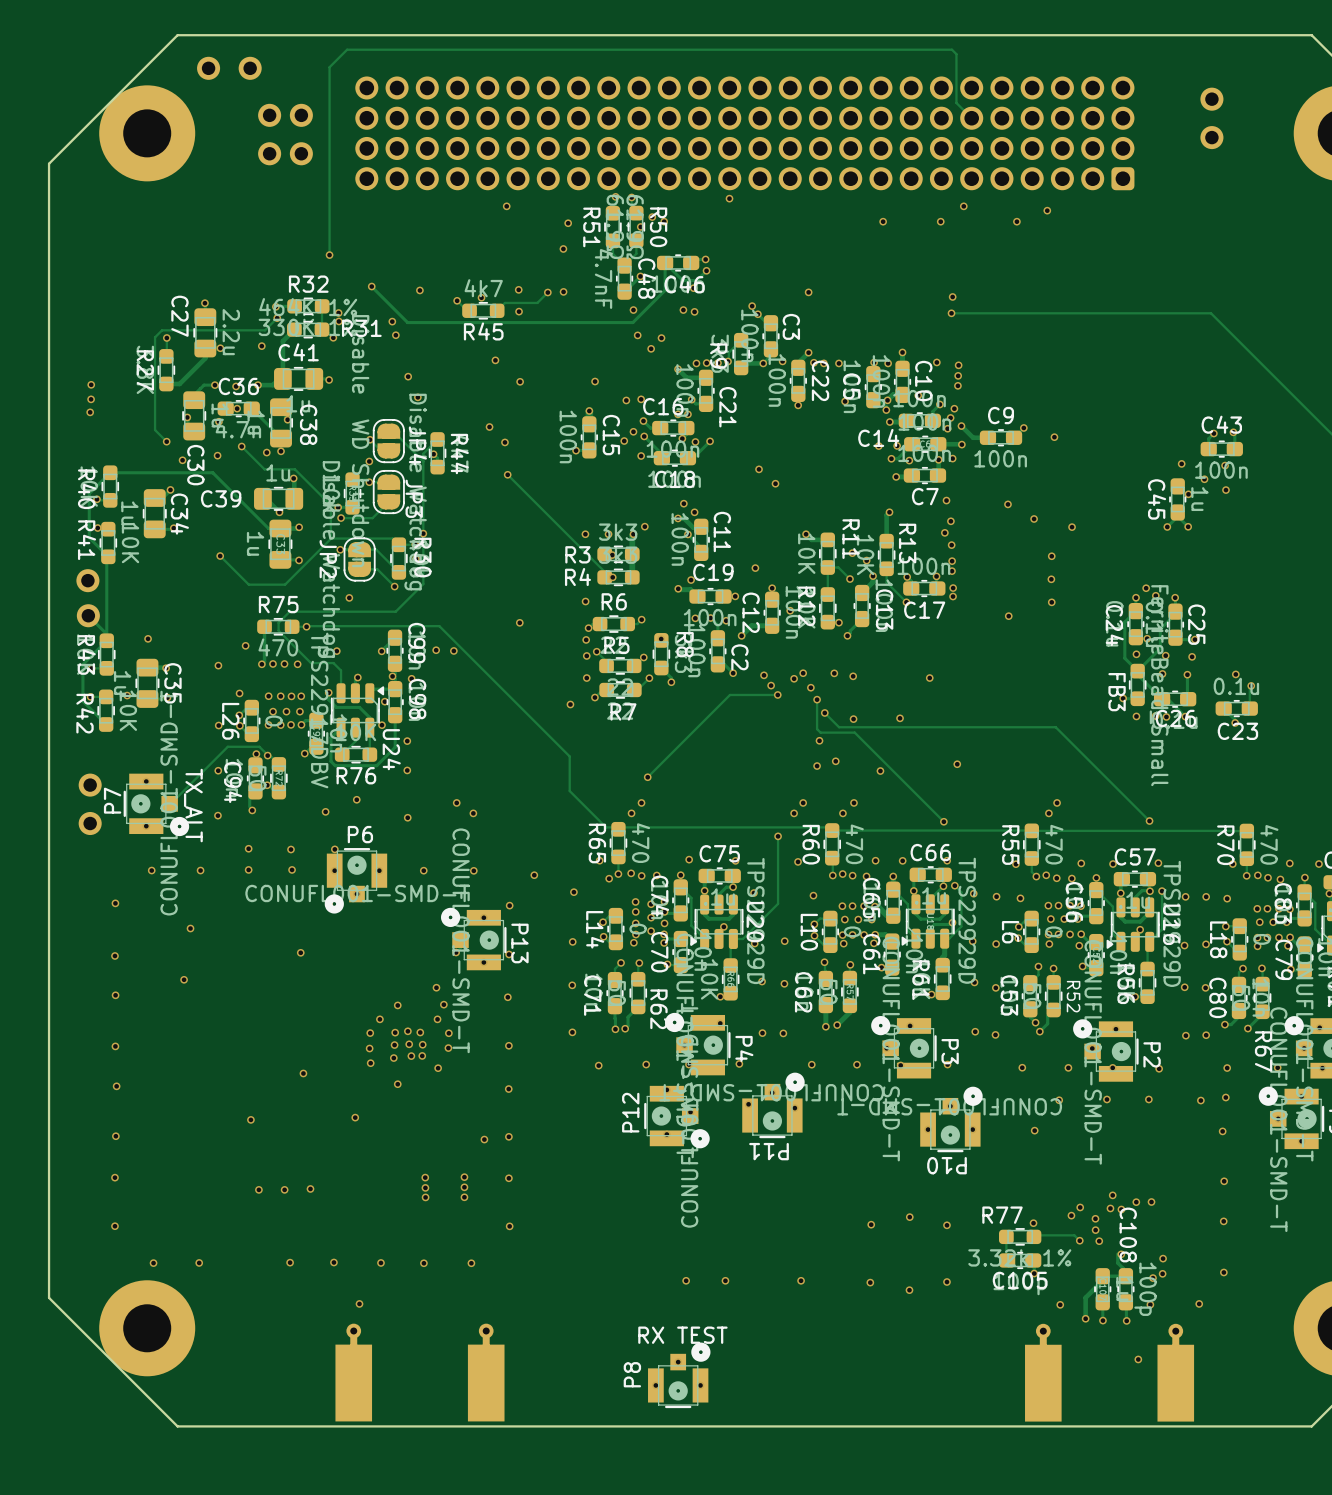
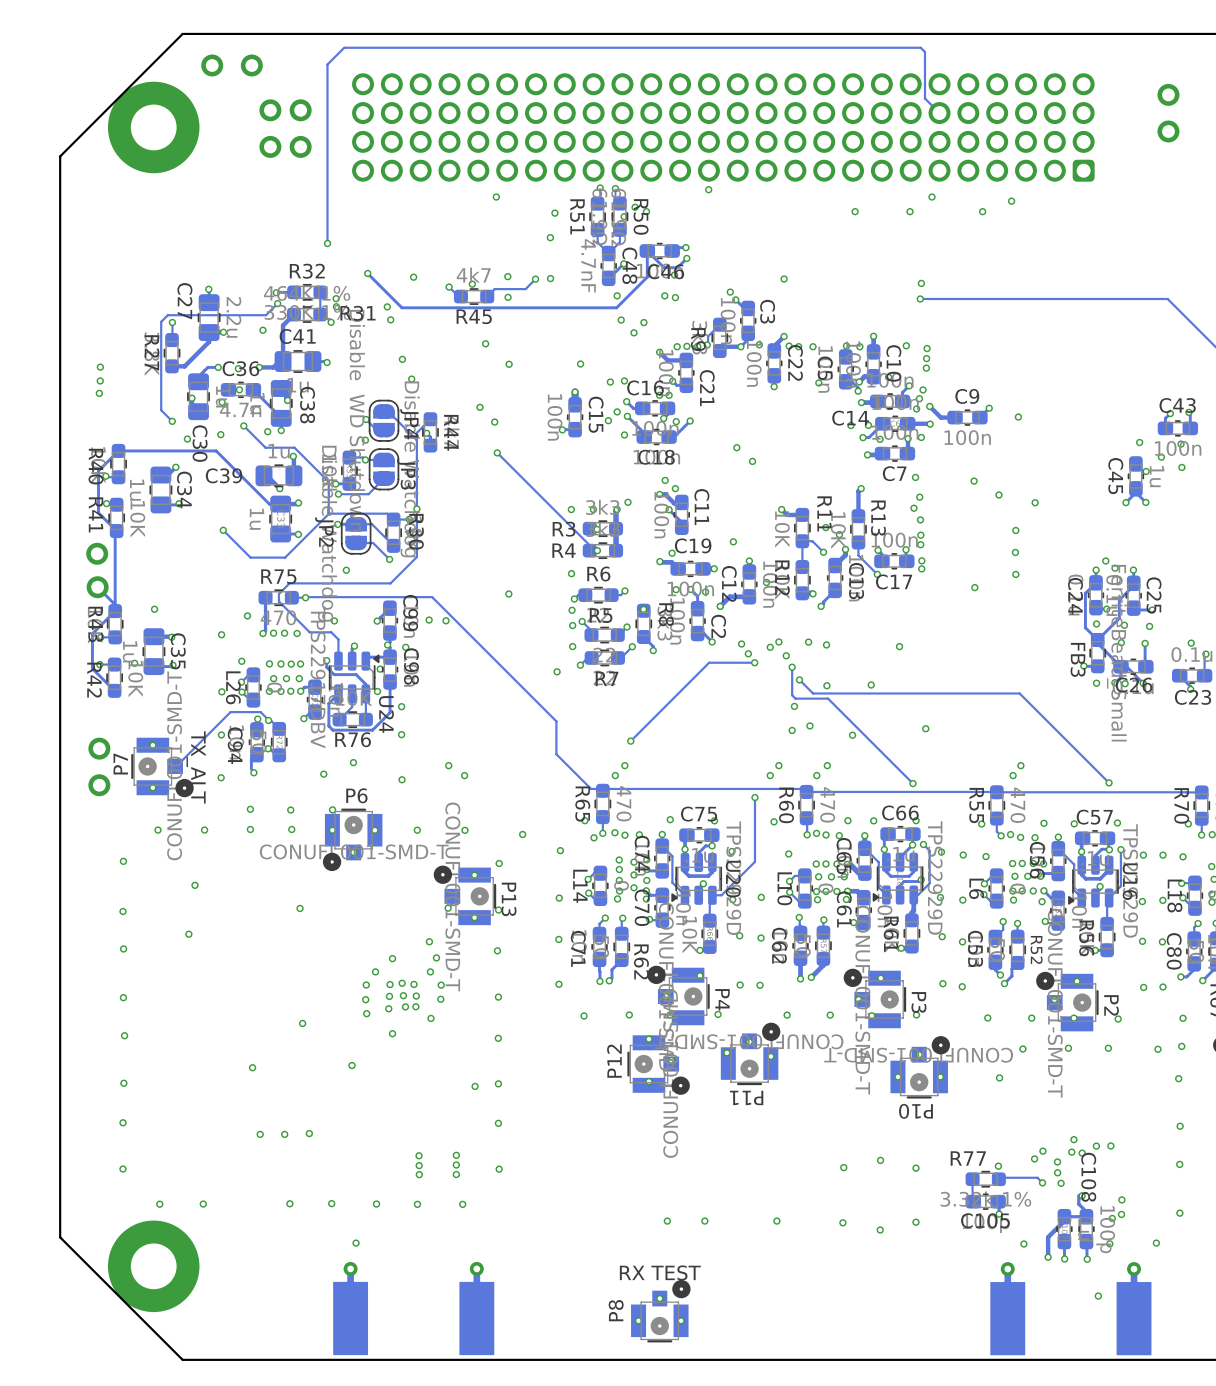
via: (425, 1177) -> none
via: (464, 1177) -> none
via: (425, 1187) -> none
via: (464, 1187) -> none
via: (425, 1197) -> none
via: (464, 1197) -> none
via: none -> (456, 1155)
via: none -> (419, 1155)
via: none -> (456, 1165)
via: none -> (419, 1165)
via: none -> (456, 1174)
via: none -> (419, 1174)

